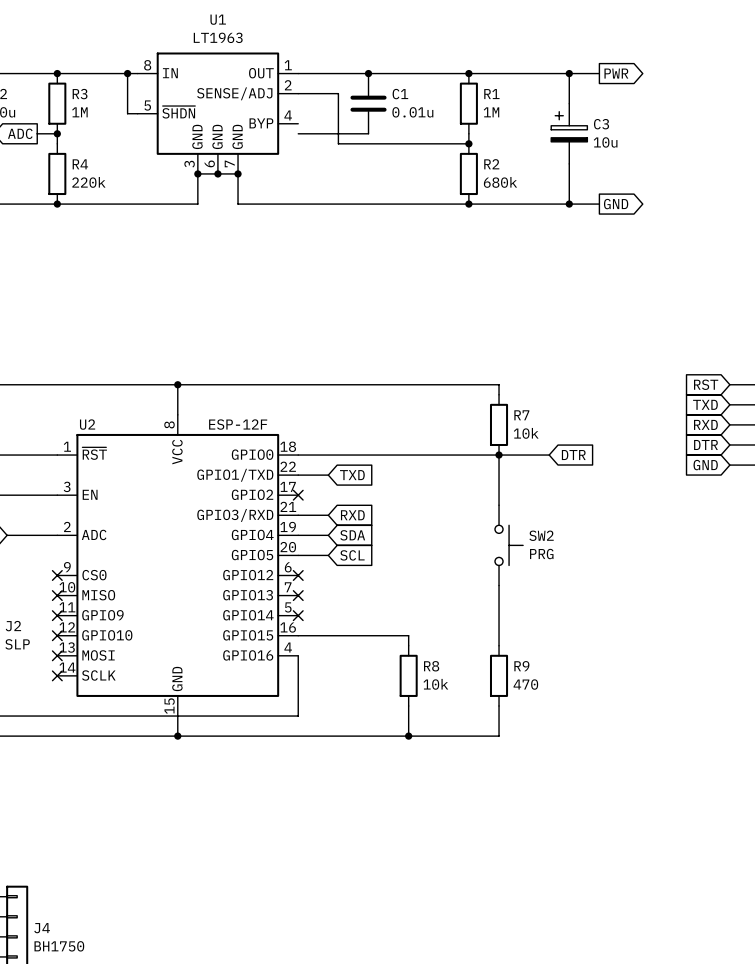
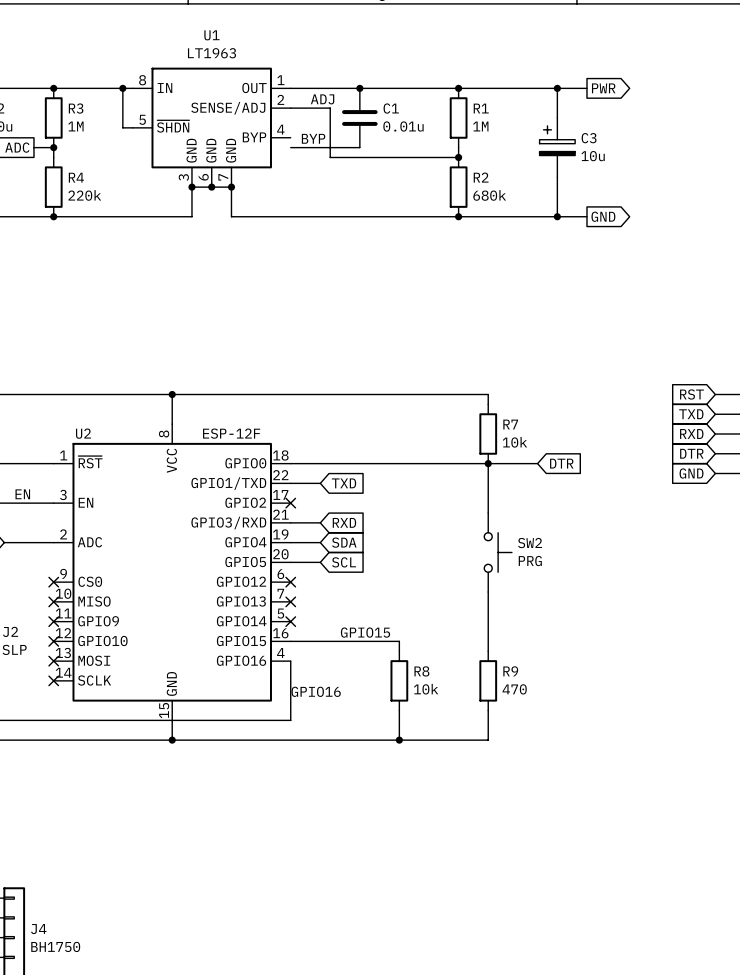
label: none -> ADJ (322, 99)
label: none -> BYP (313, 138)
label: none -> EN (22, 494)
label: none -> GPIO15 (365, 632)
label: none -> GPIO16 (316, 691)

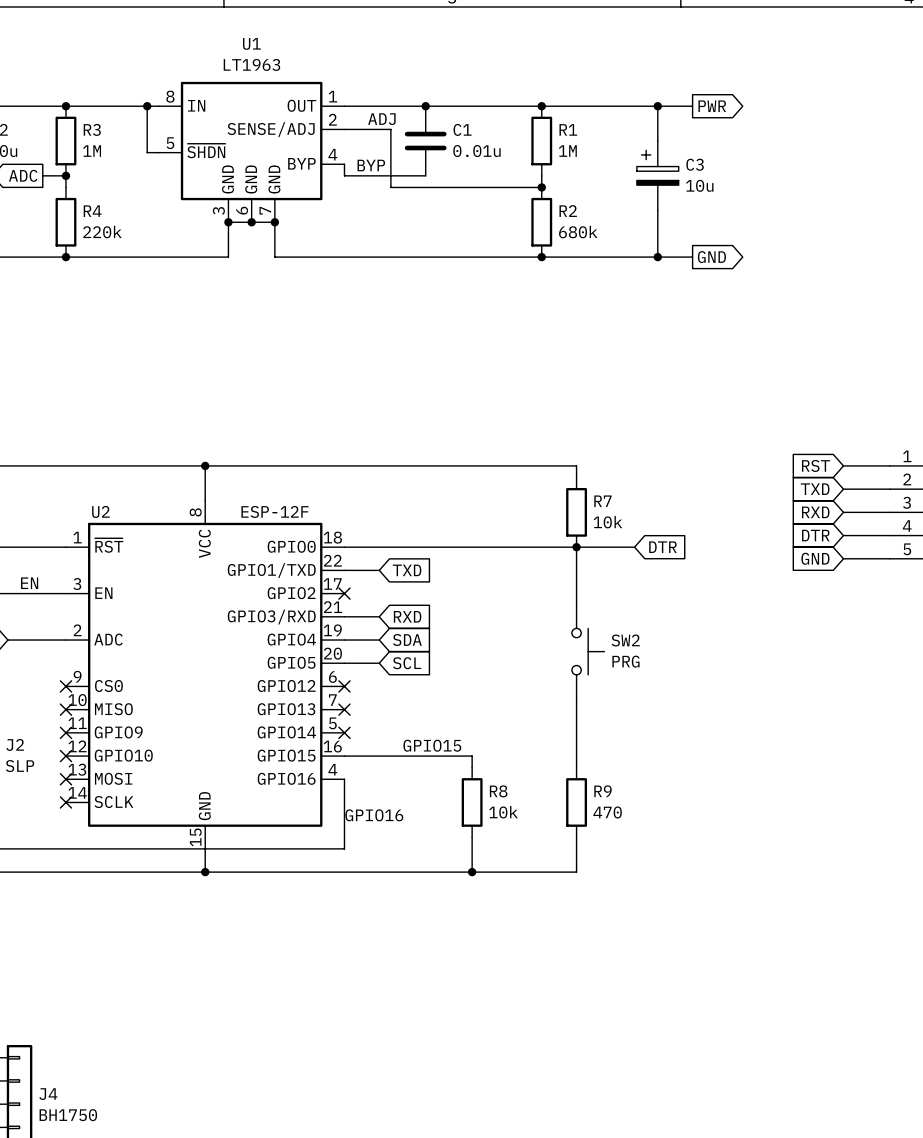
wire: none -> (344, 164) (344, 175)

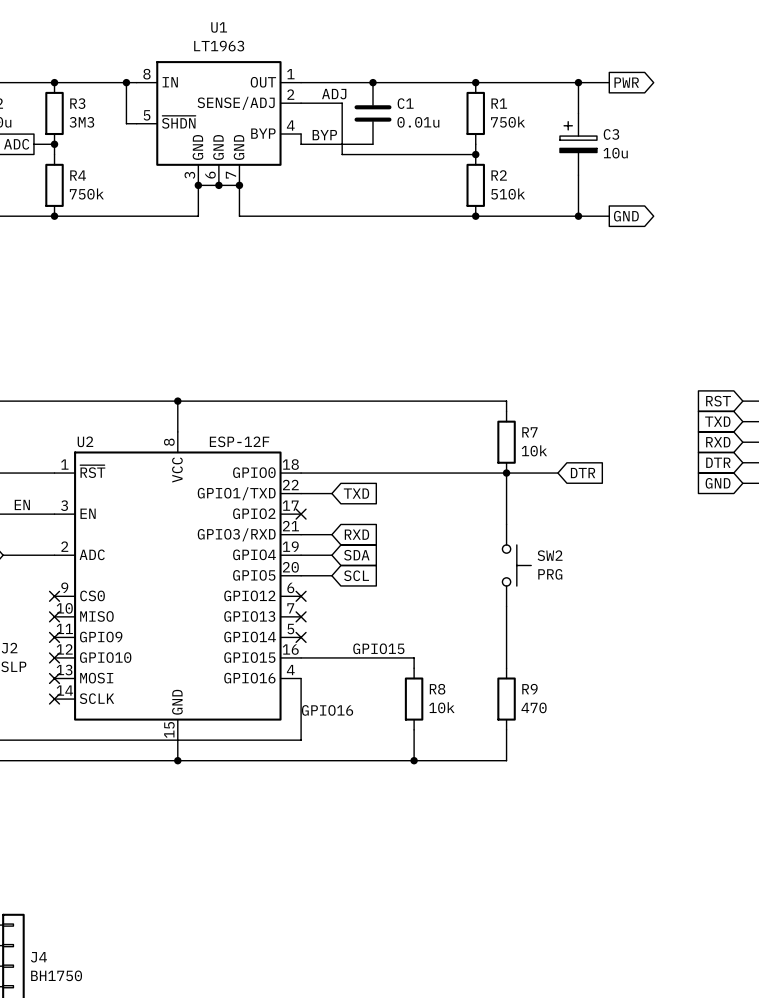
R3 value: 1M (92, 151) -> 3M3 (81, 122)
R1 value: 1M (567, 151) -> 750k (508, 122)
R4 value: 220k (102, 232) -> 750k (86, 194)
R2 value: 680k (578, 232) -> 510k (508, 194)

